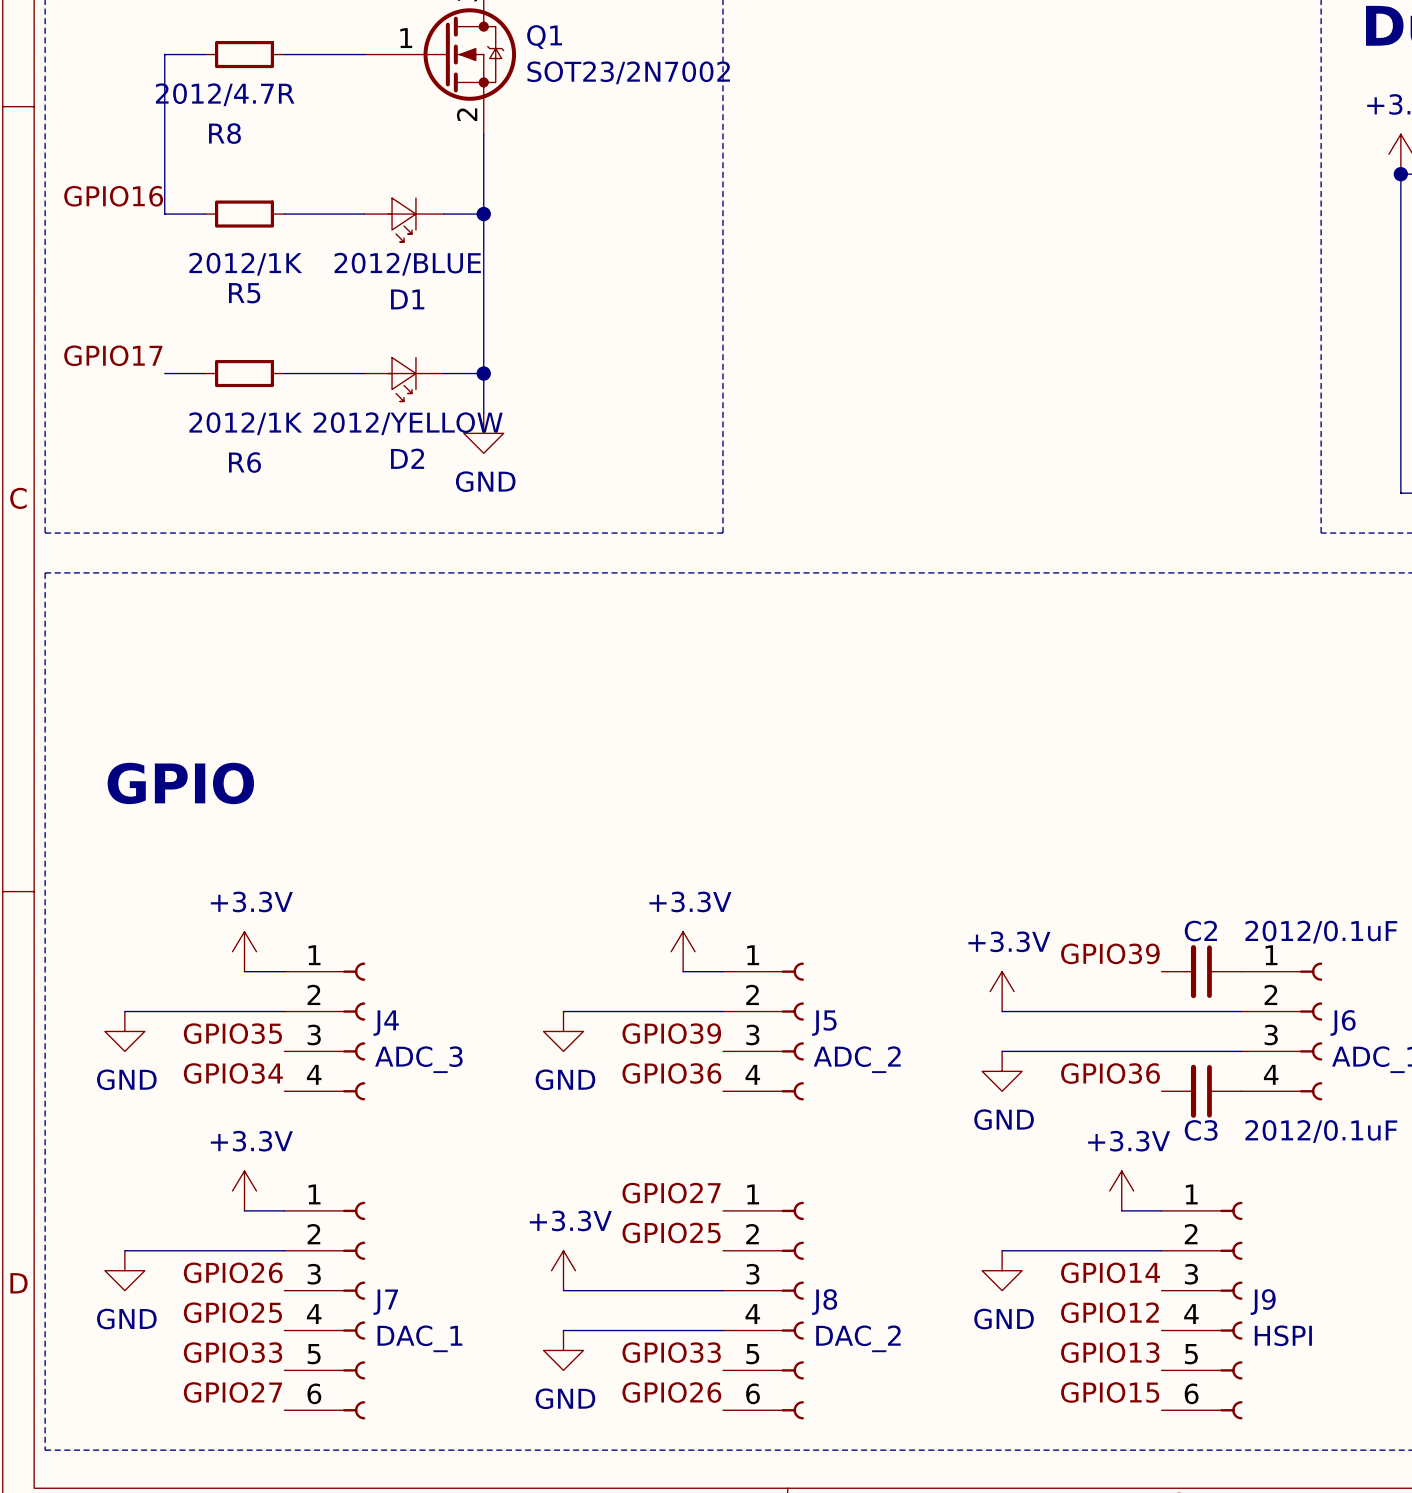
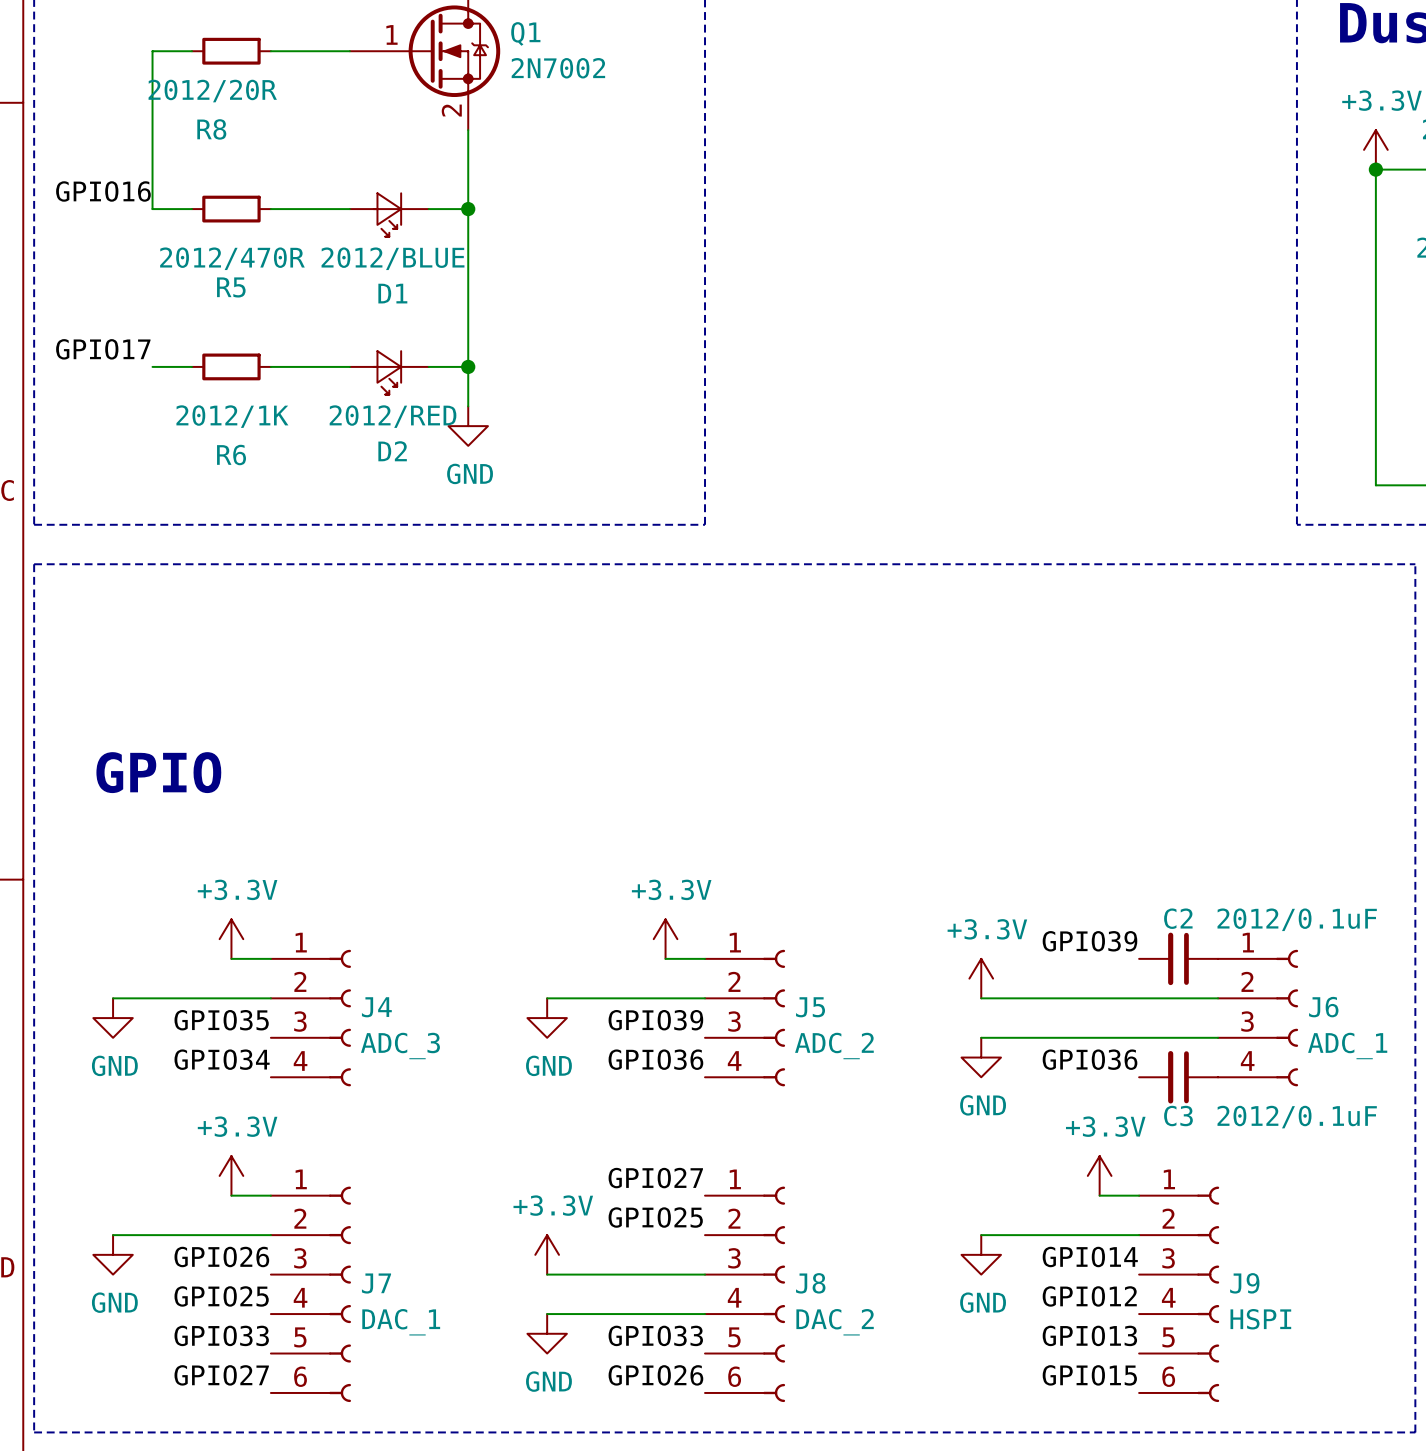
Q1 value: SOT23/2N7002 (628, 72) -> 2N7002 (558, 68)
R8 value: 2012/4.7R (225, 94) -> 2012/20R (212, 91)
R5 value: 2012/1K (245, 264) -> 2012/470R (232, 258)
D2 value: 2012/YELLOW (408, 423) -> 2012/RED (393, 416)

